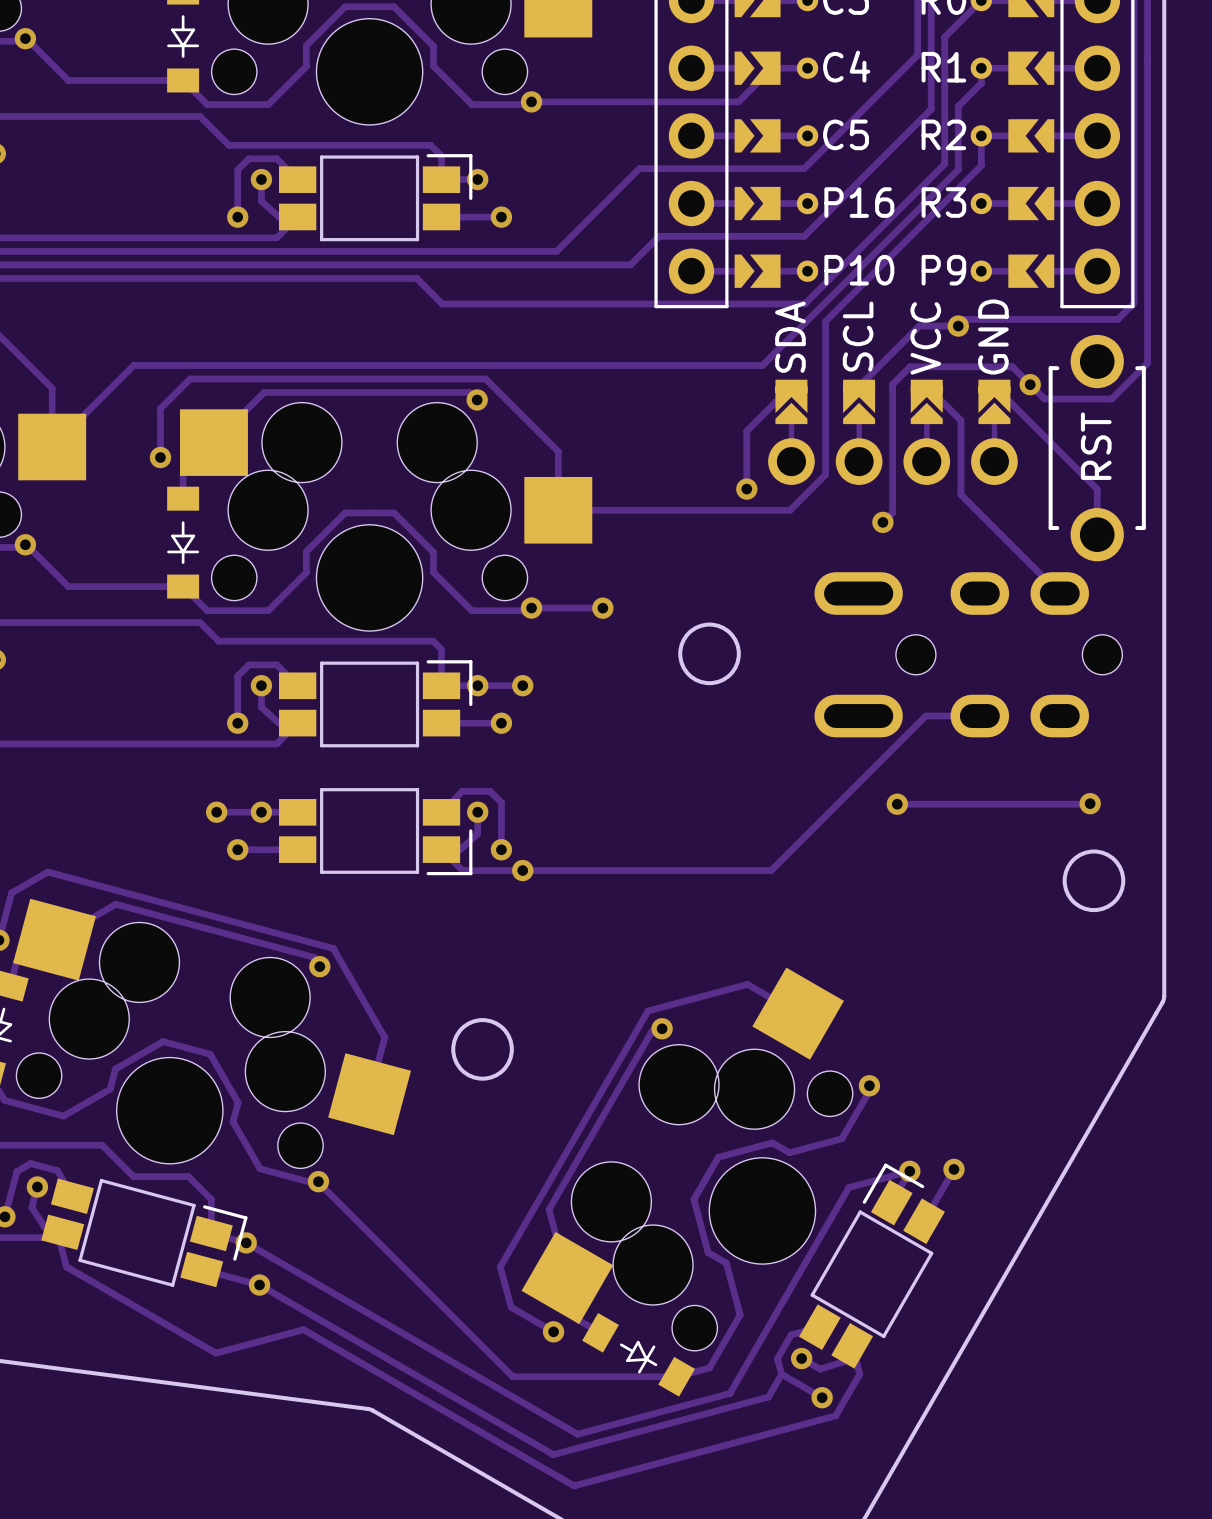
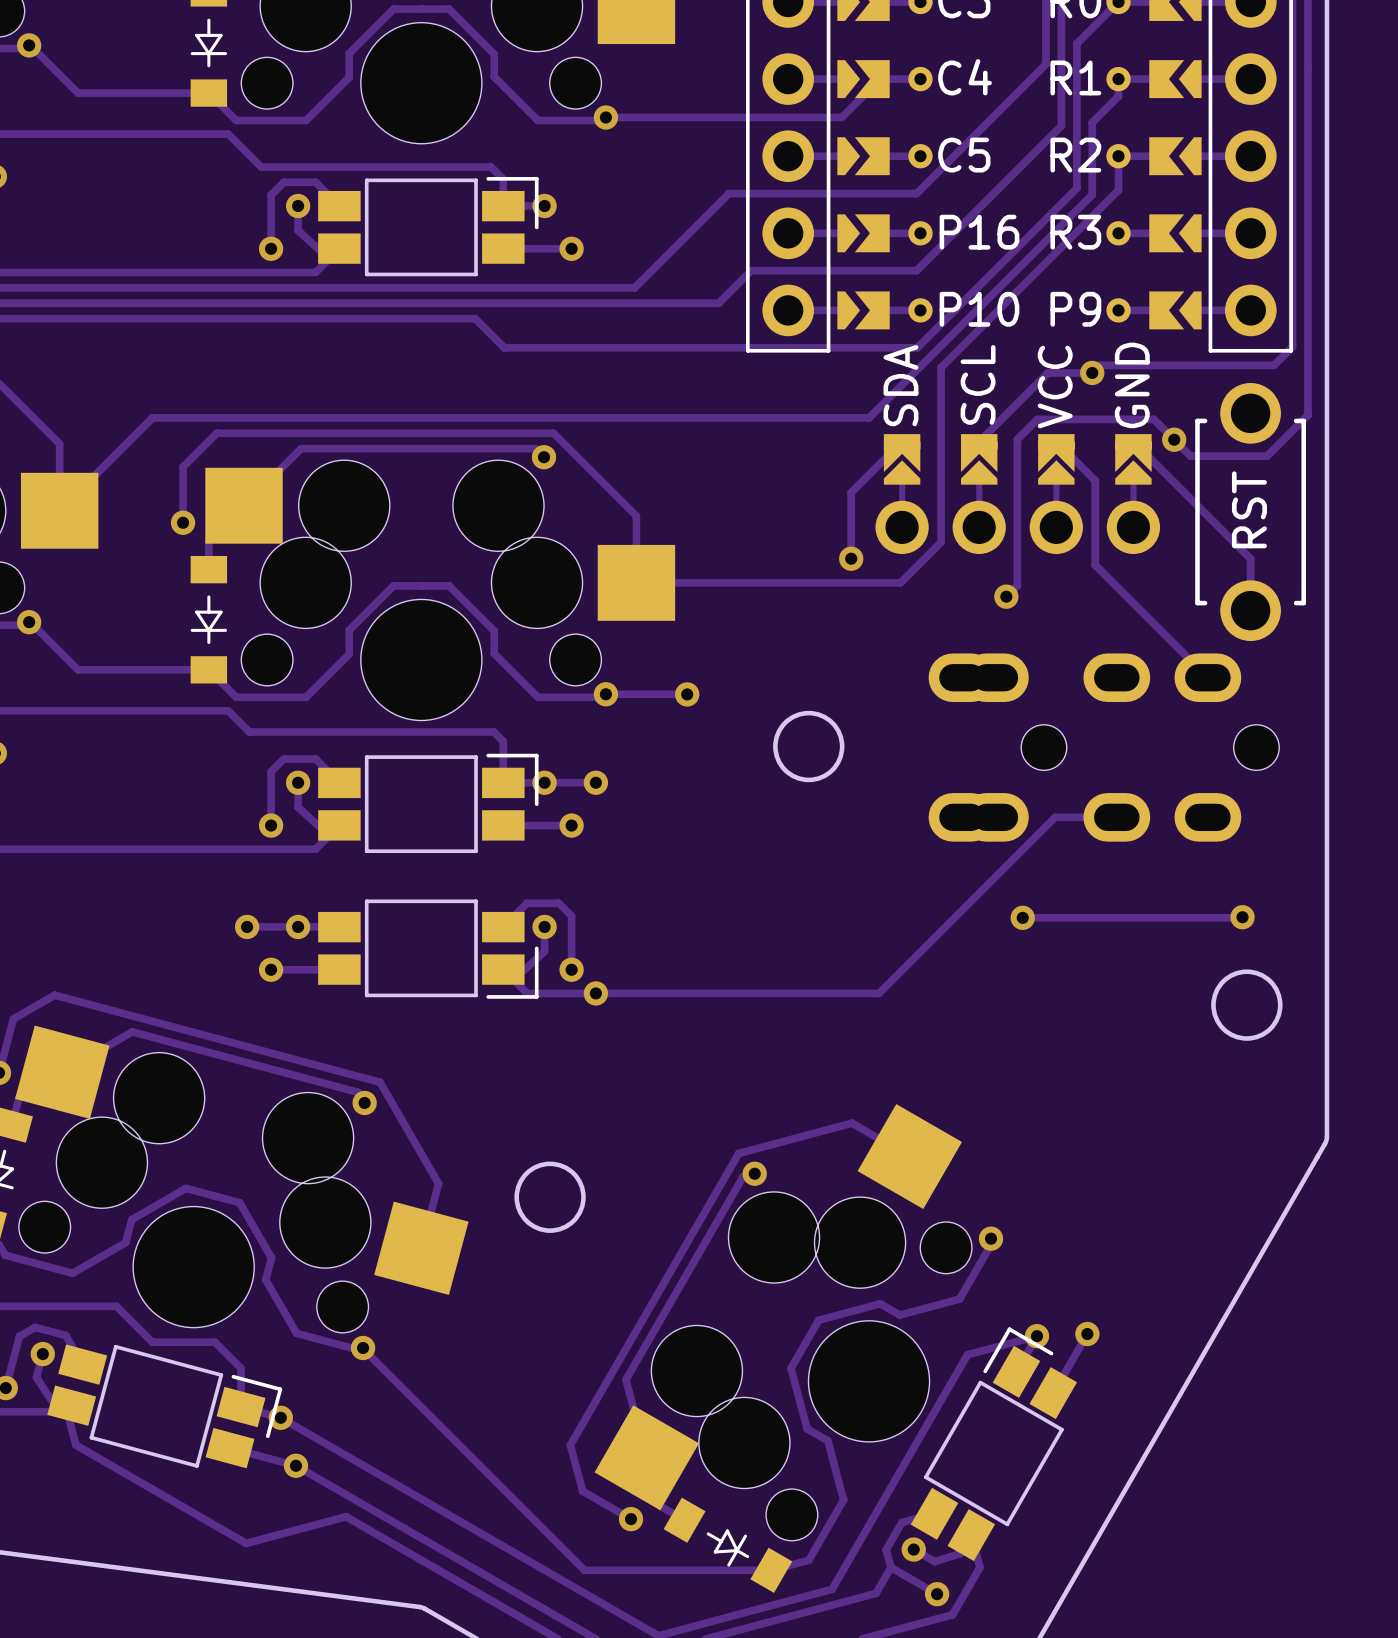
part footprint: [814, 572, 1123, 738] -> [928, 653, 1280, 842]

